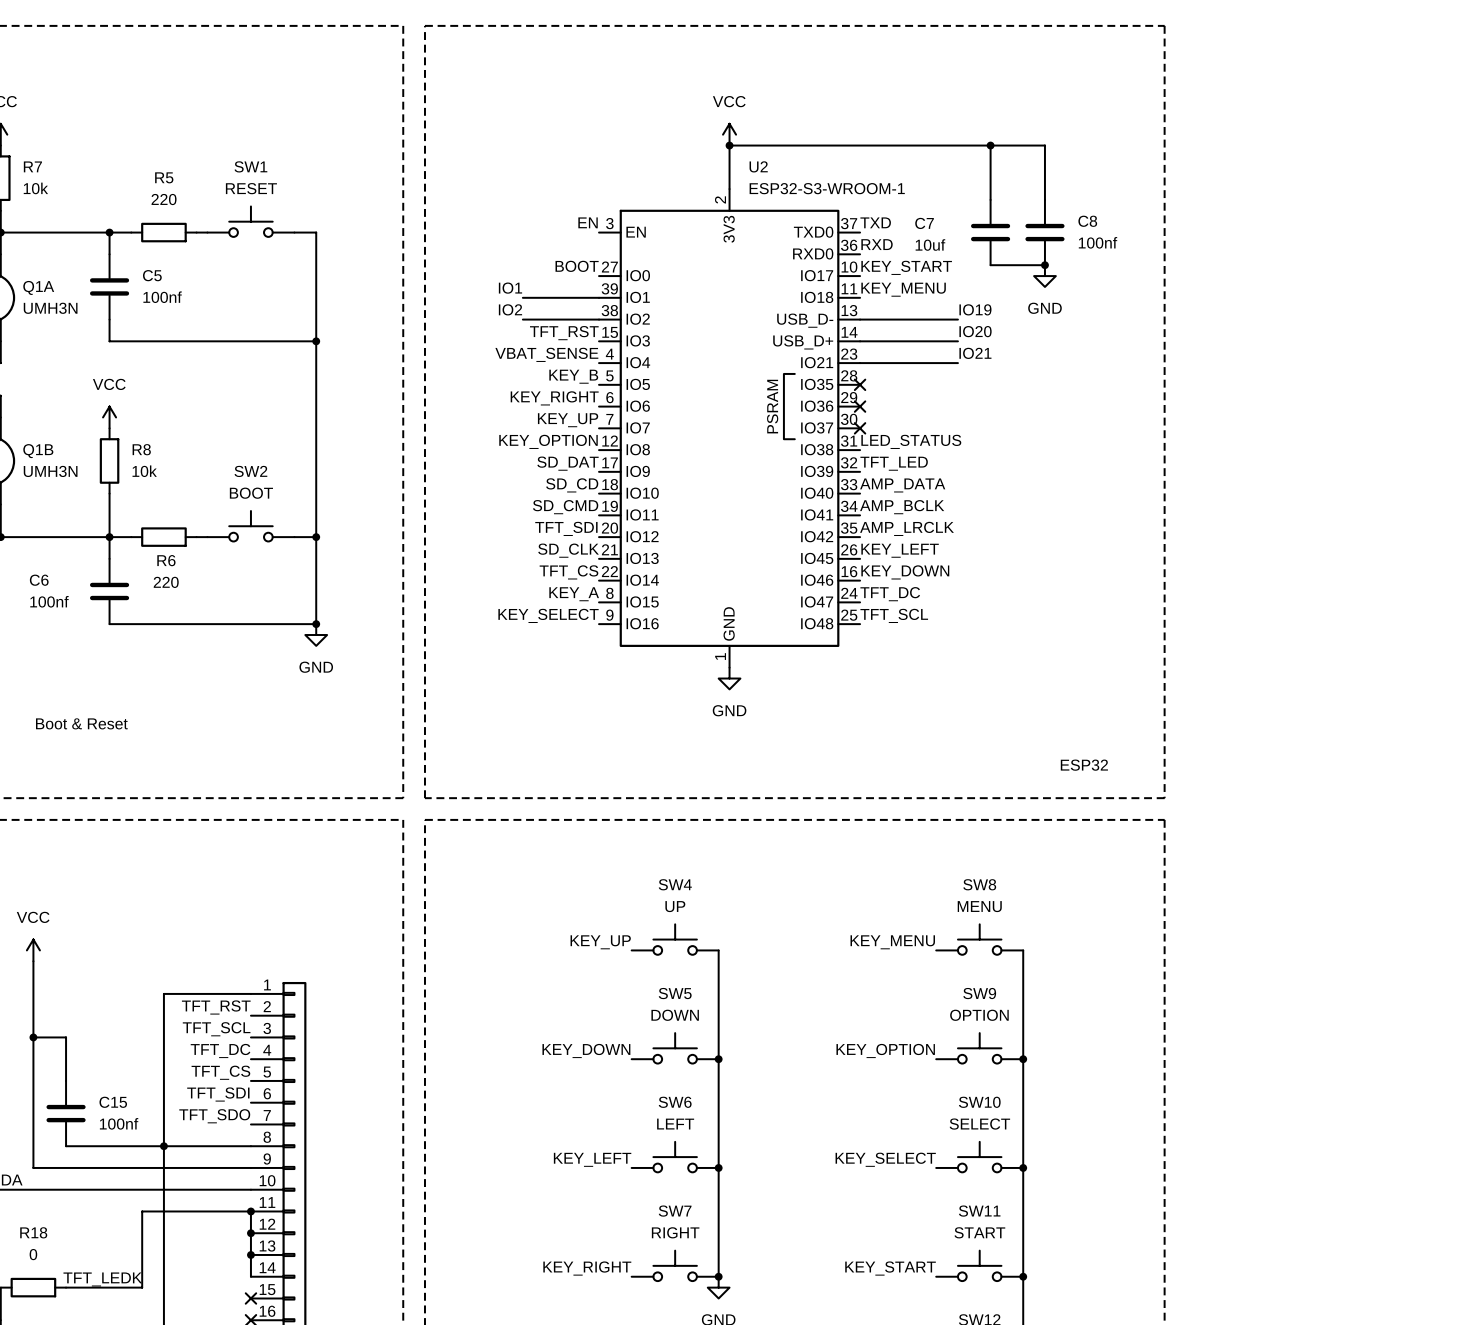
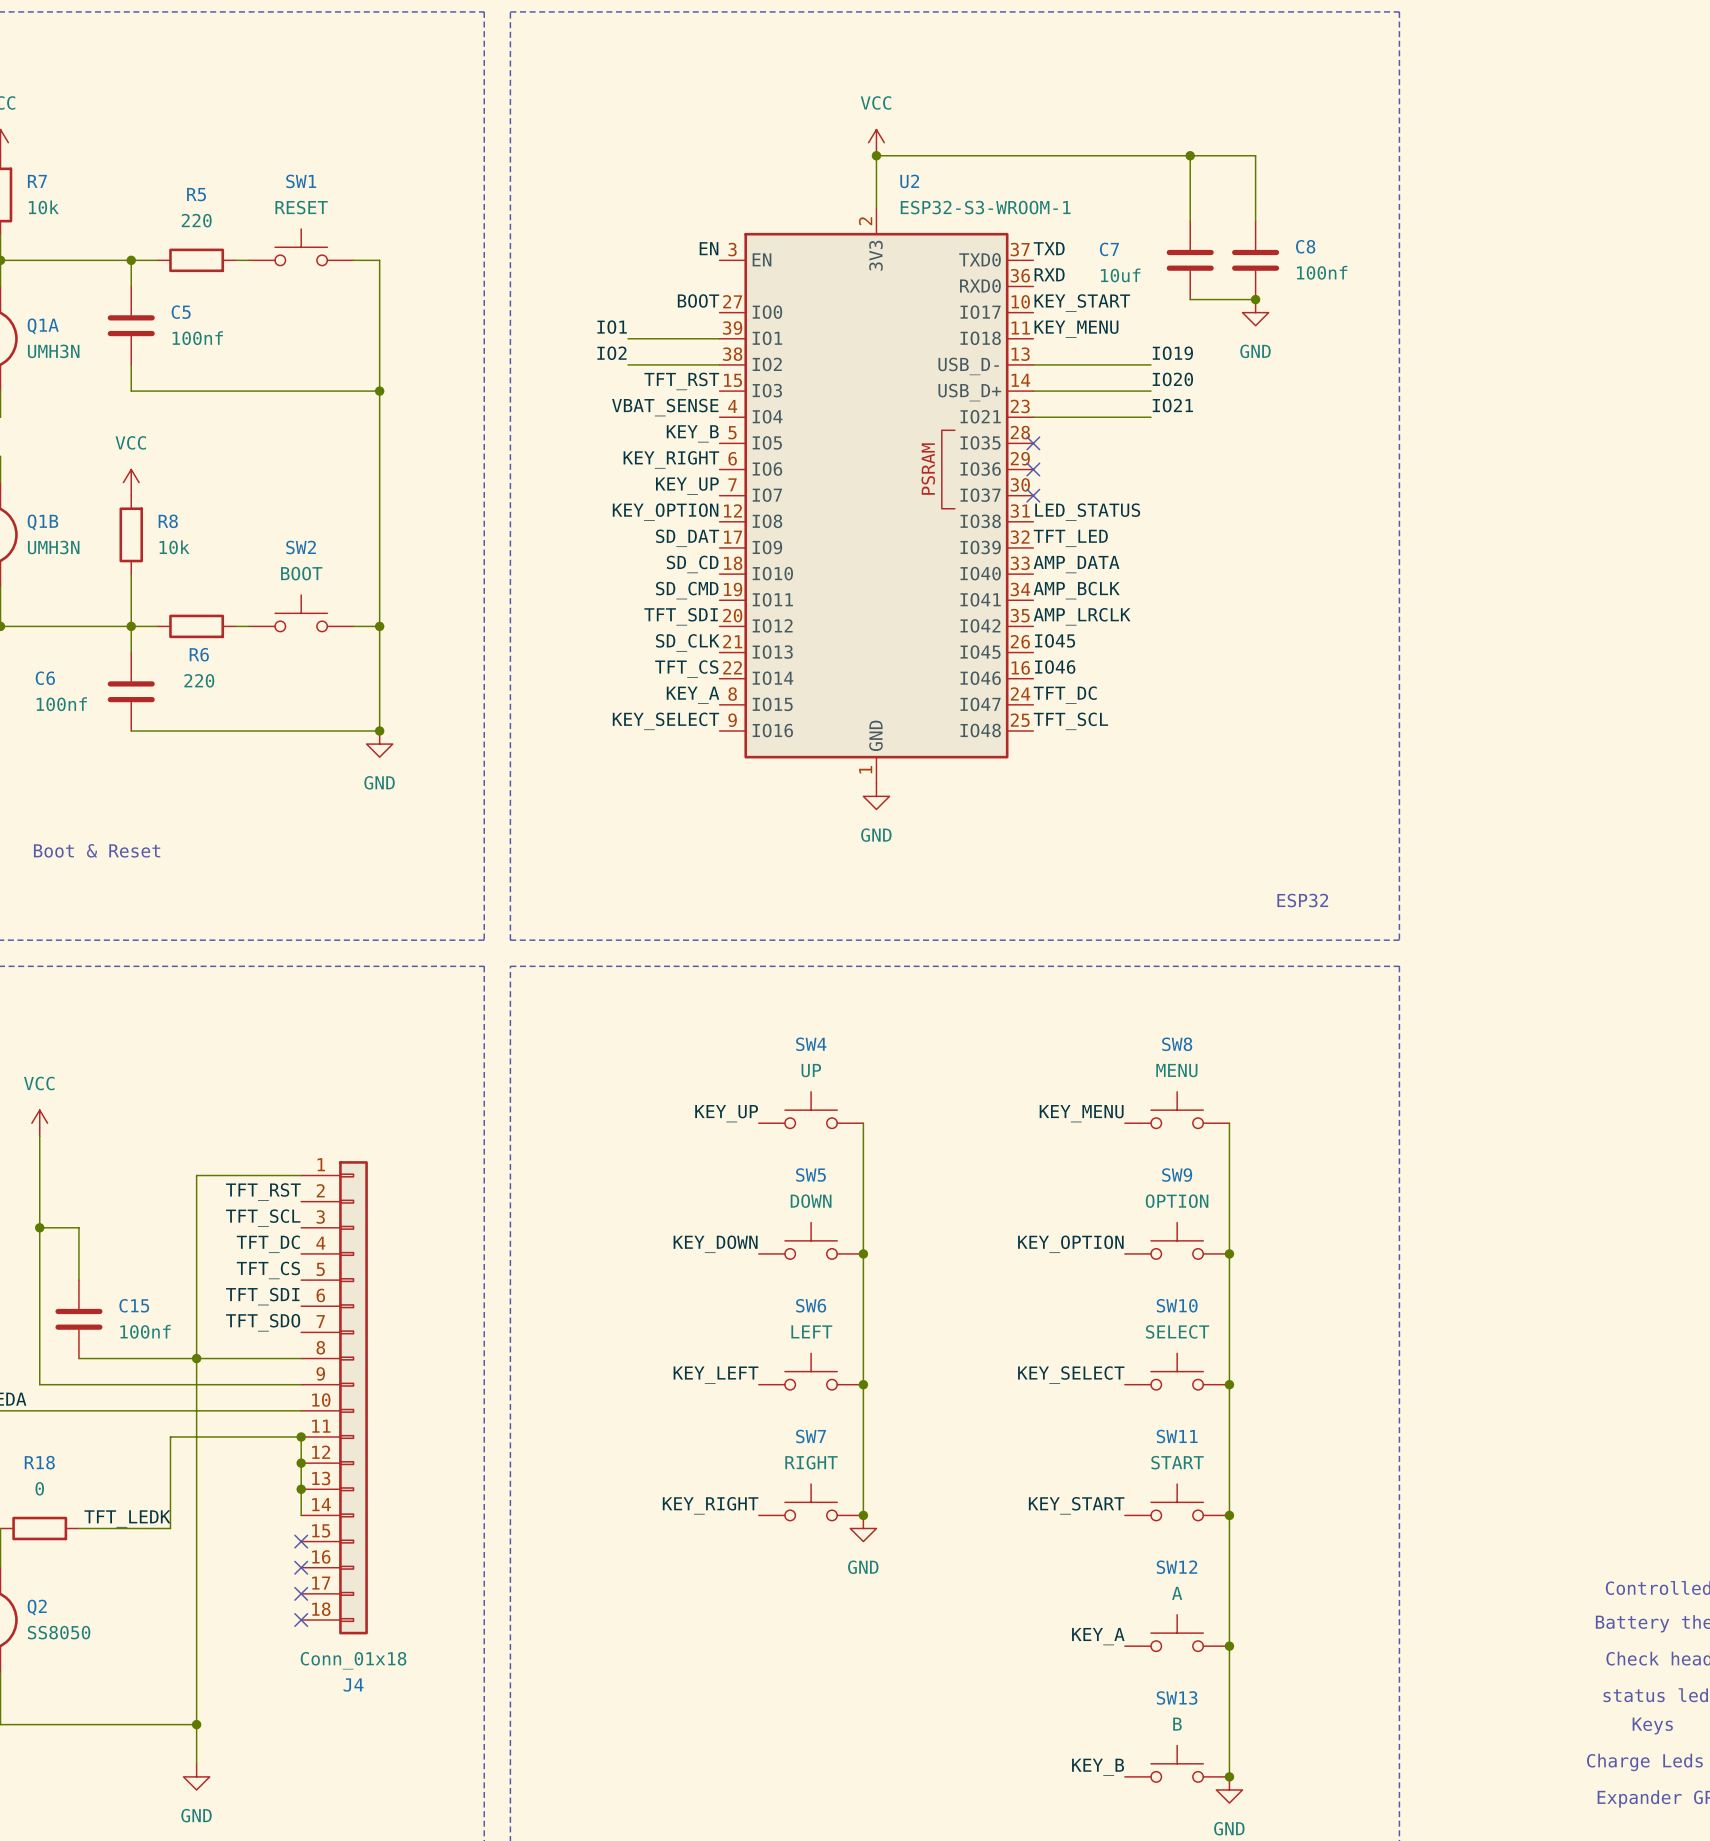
label: KEY_LEFT (900, 550) -> IO45 (1055, 640)
label: KEY_DOWN (905, 572) -> IO46 (1055, 667)

